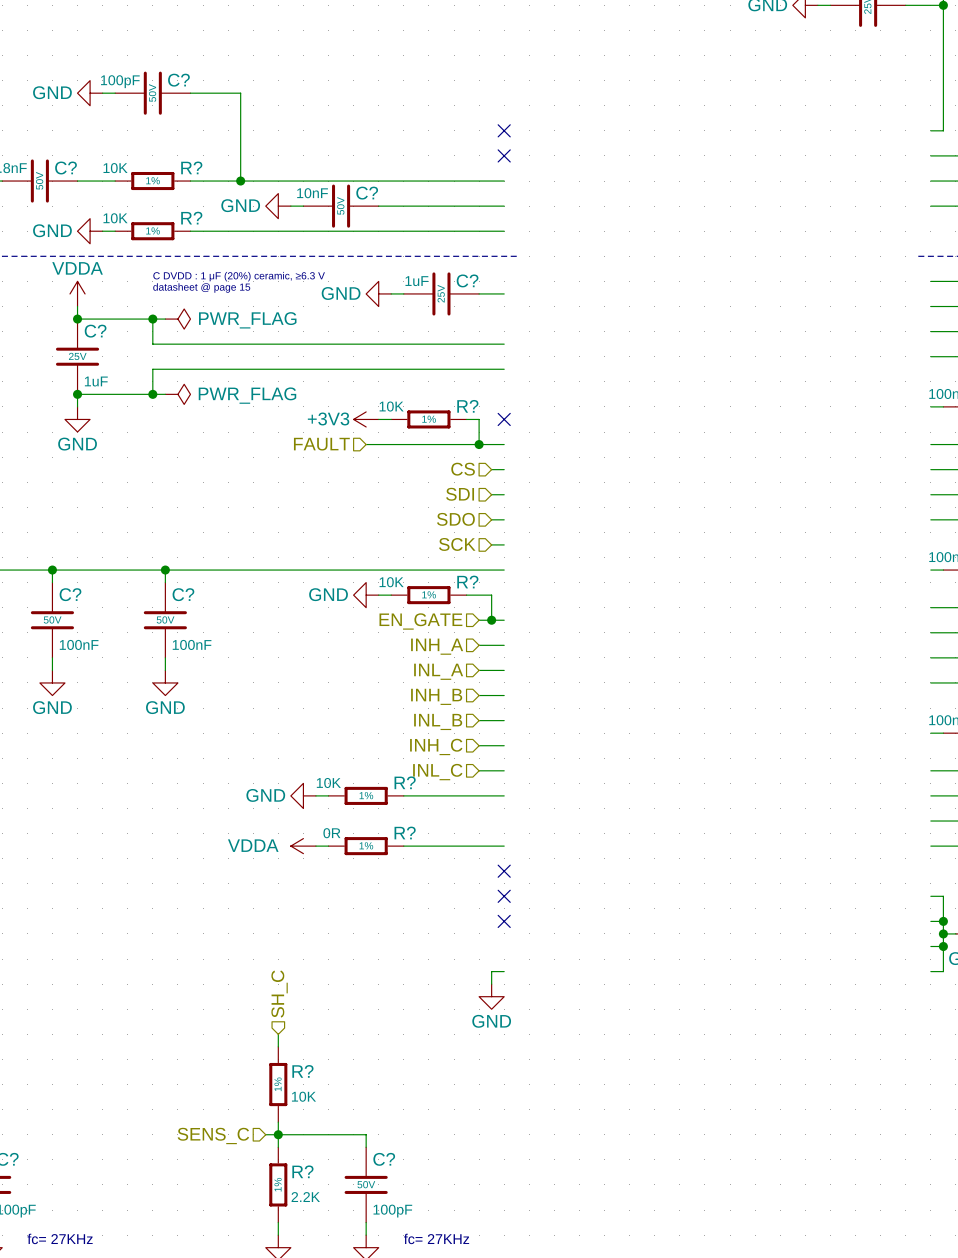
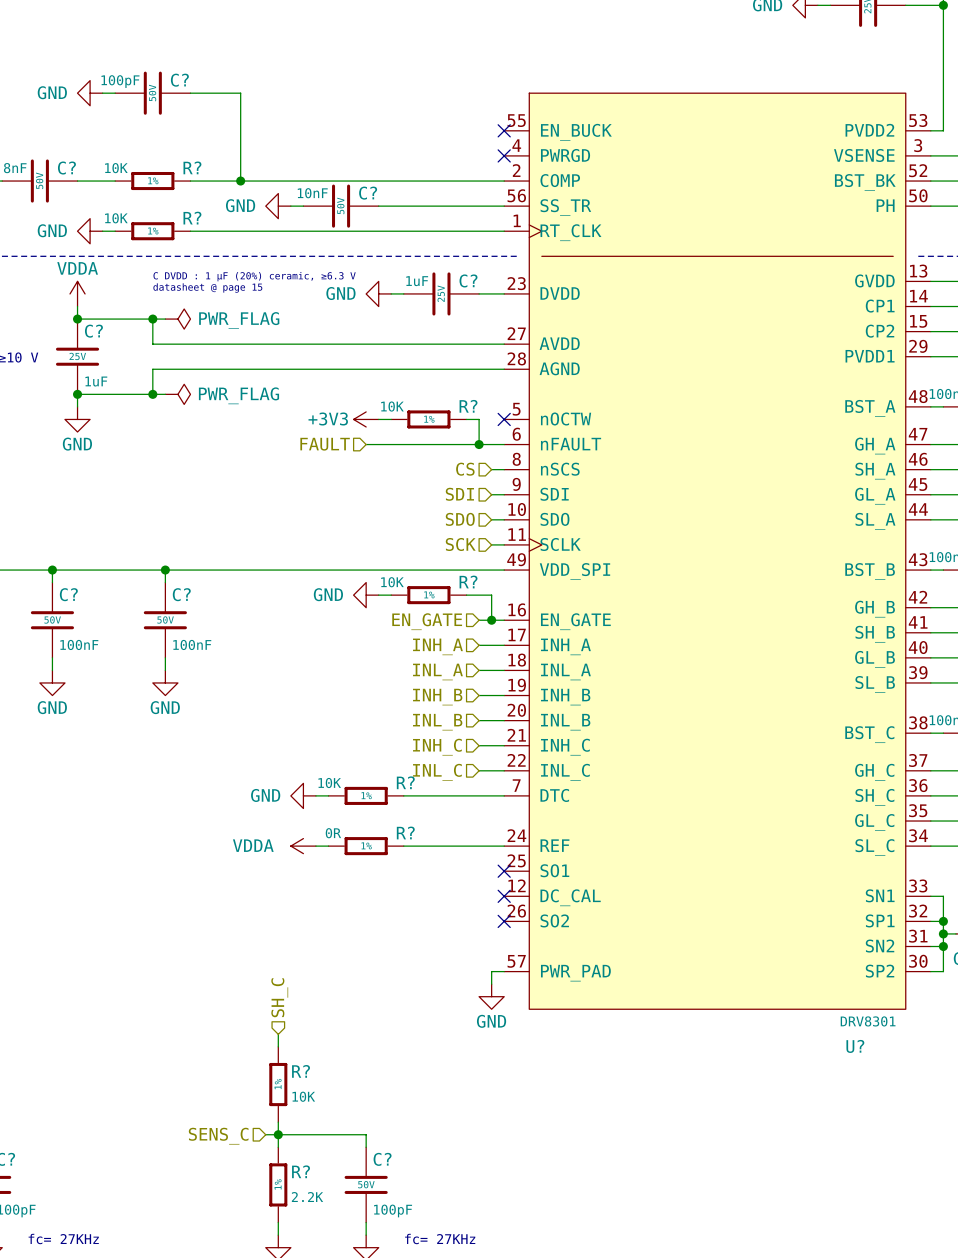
U?: none -> DRV8301 (717, 551)

